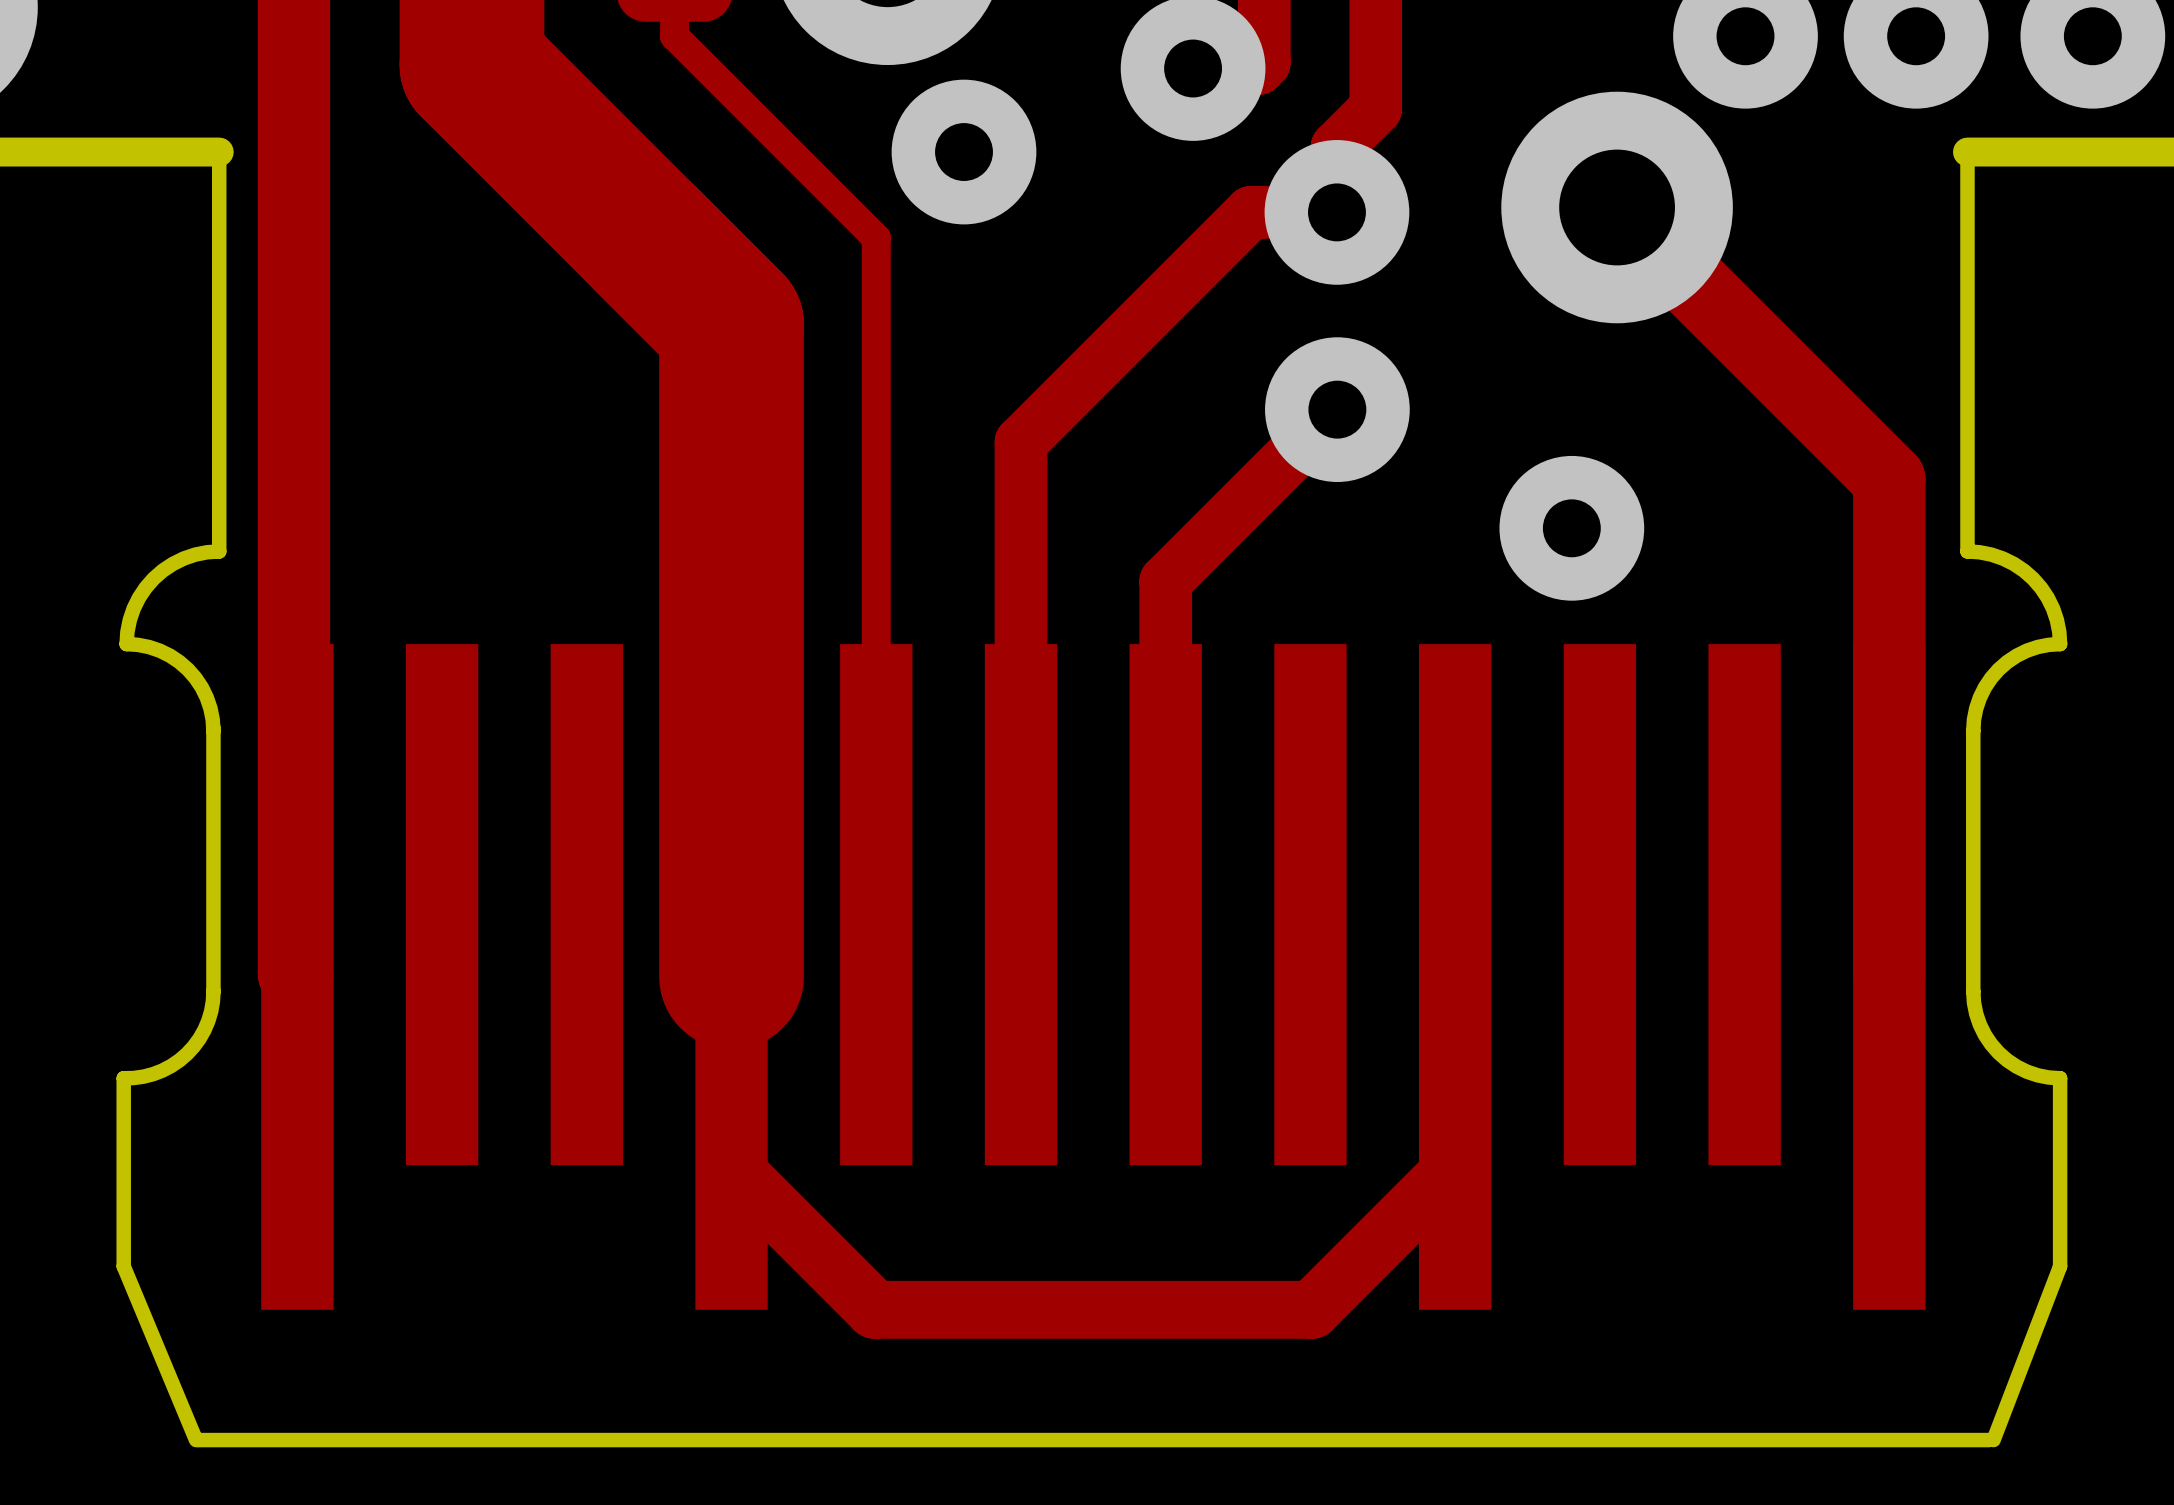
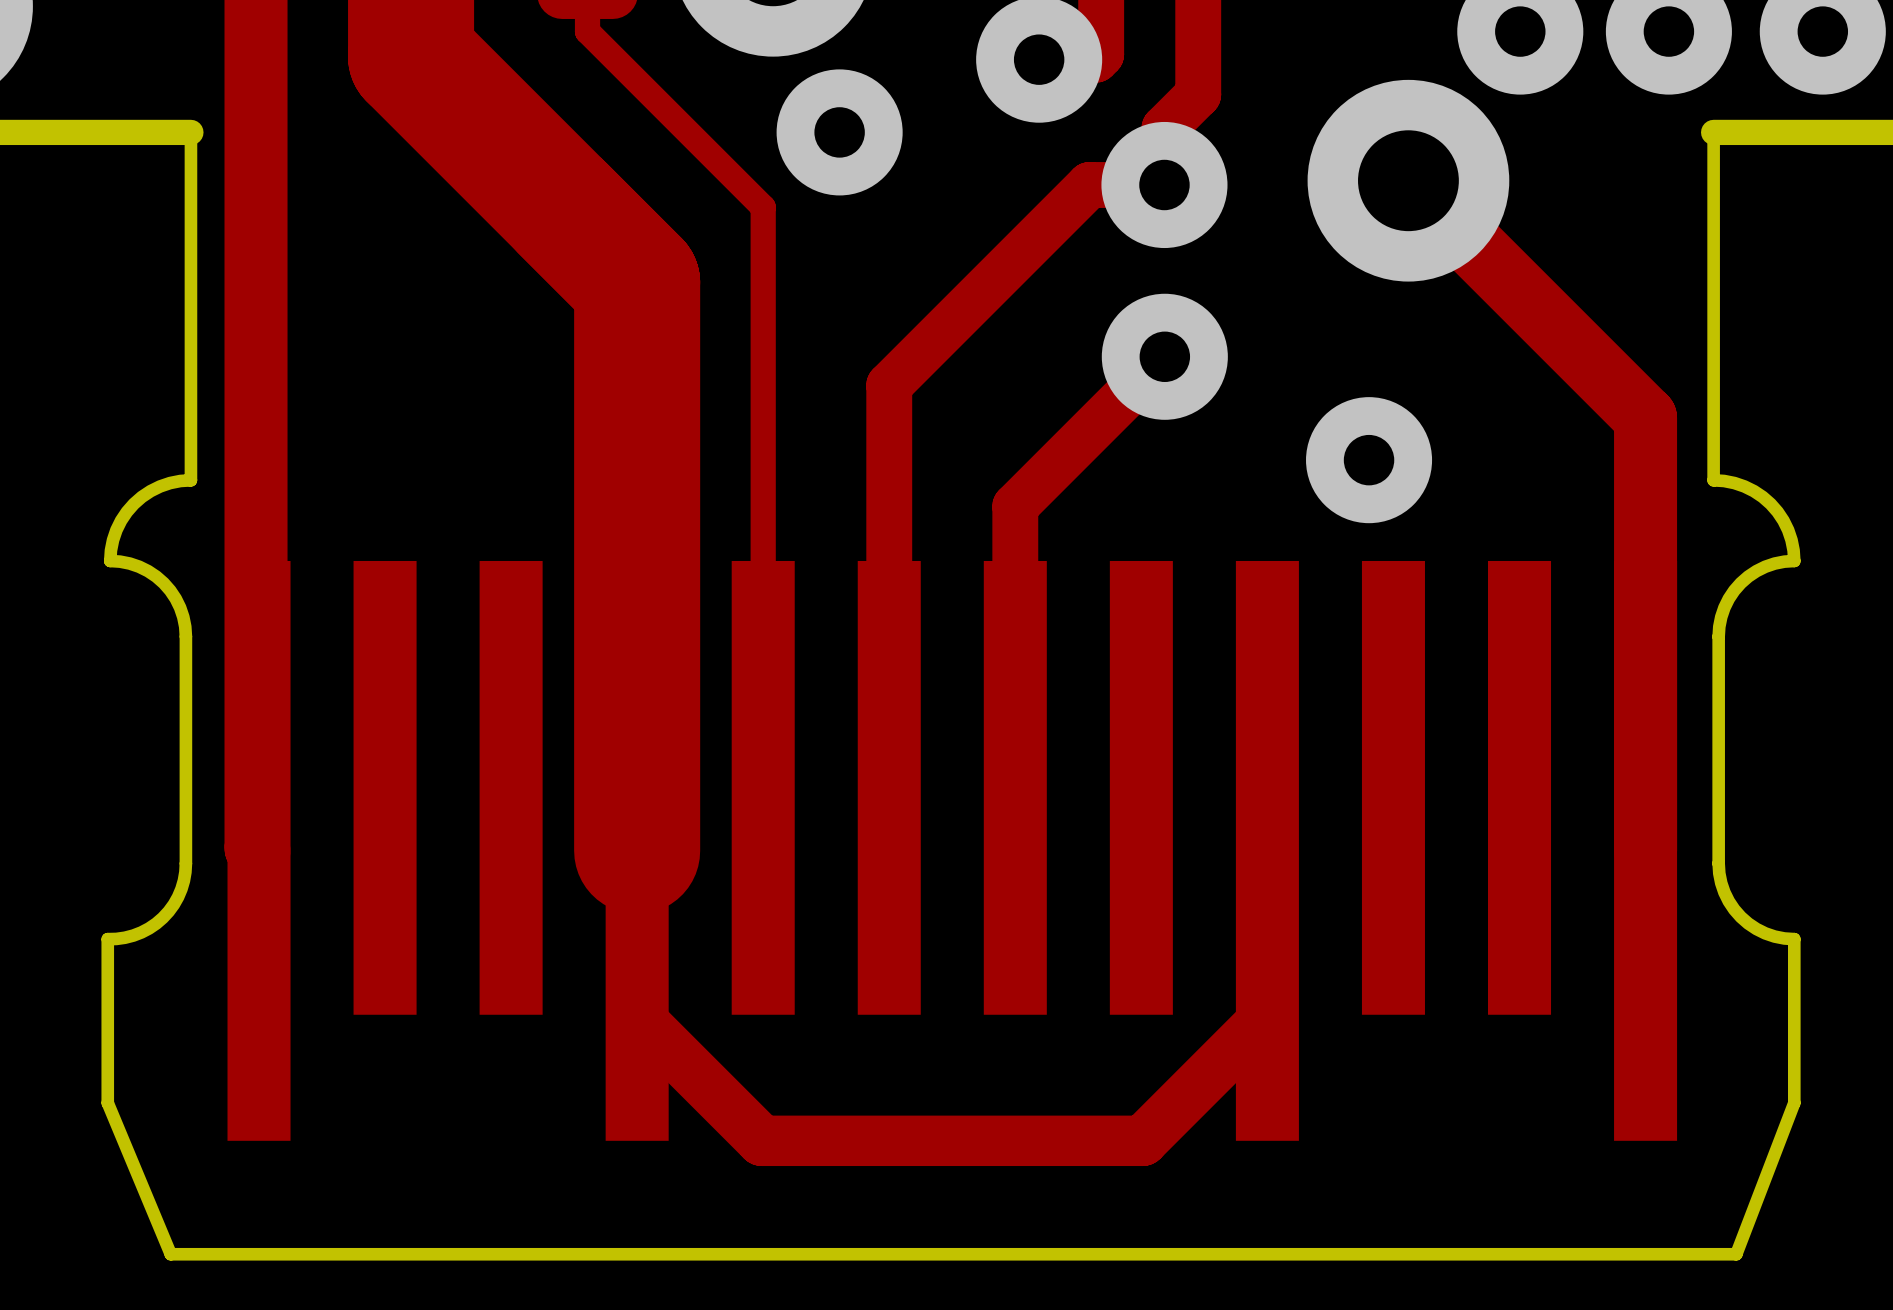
part footprint: [116, 144, 2068, 1448] -> [101, 126, 1801, 1261]

